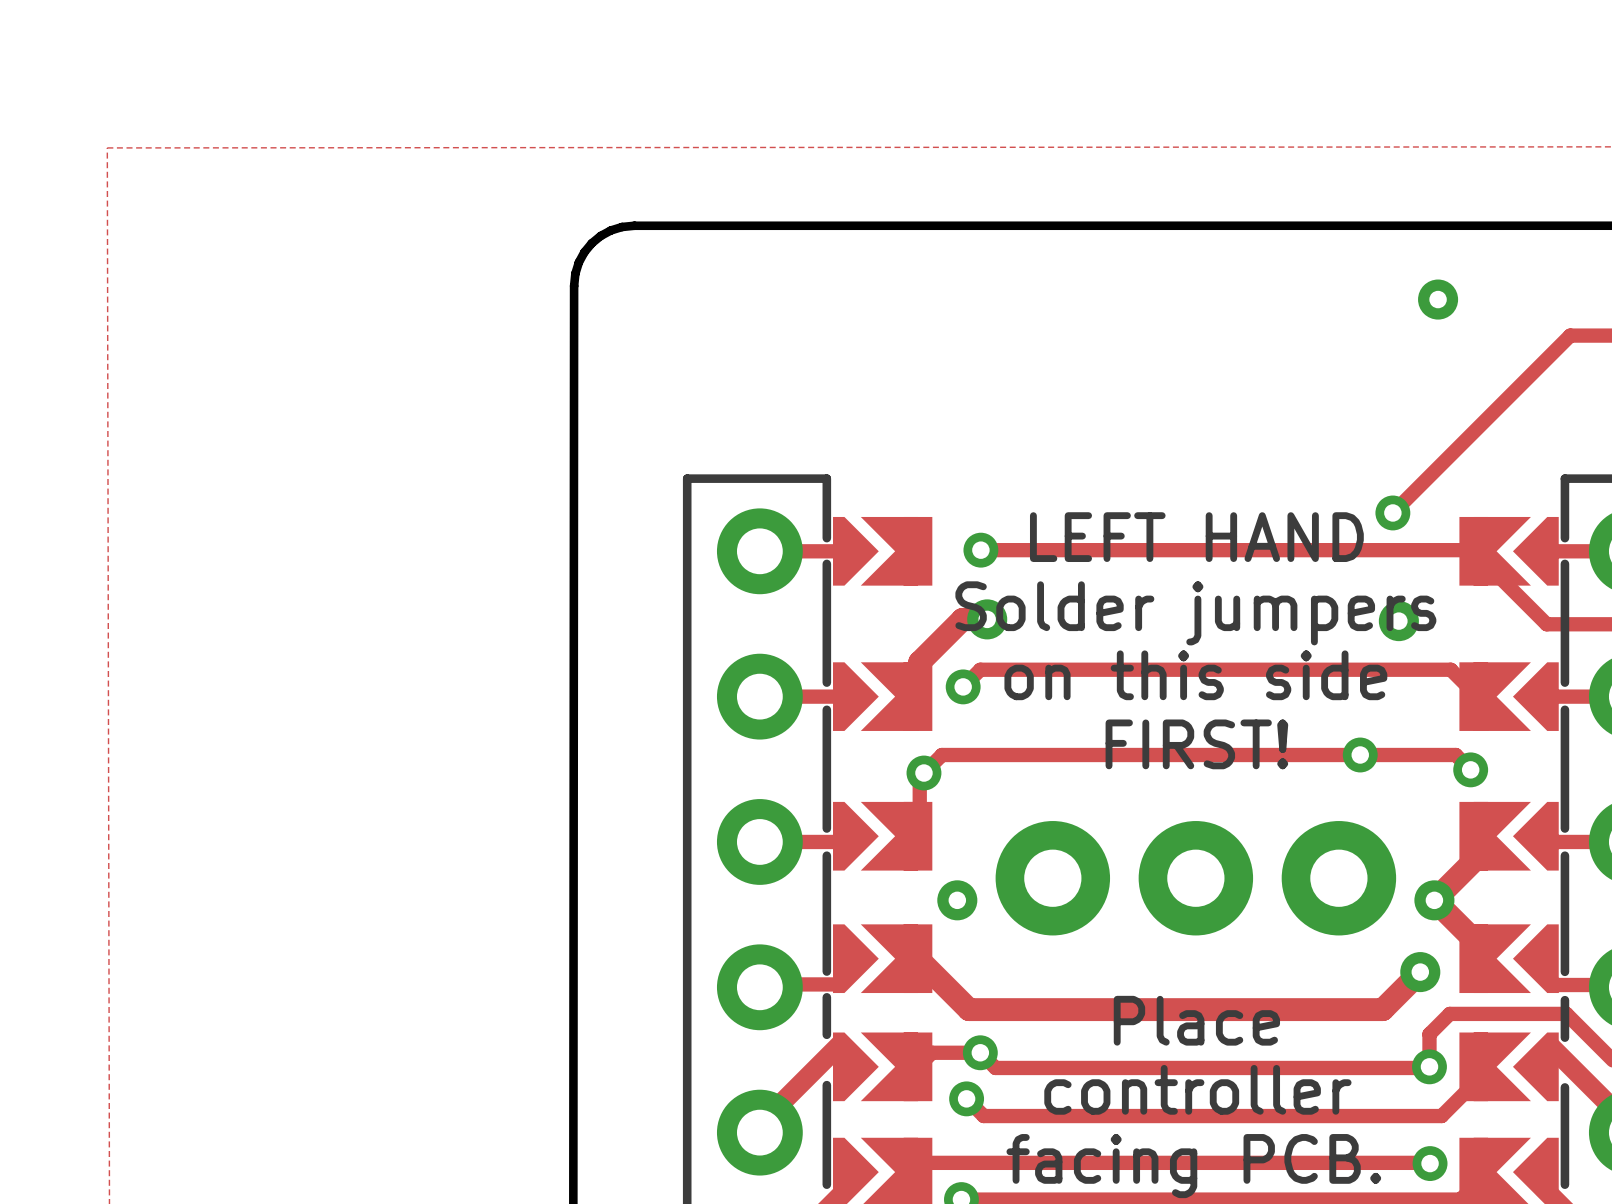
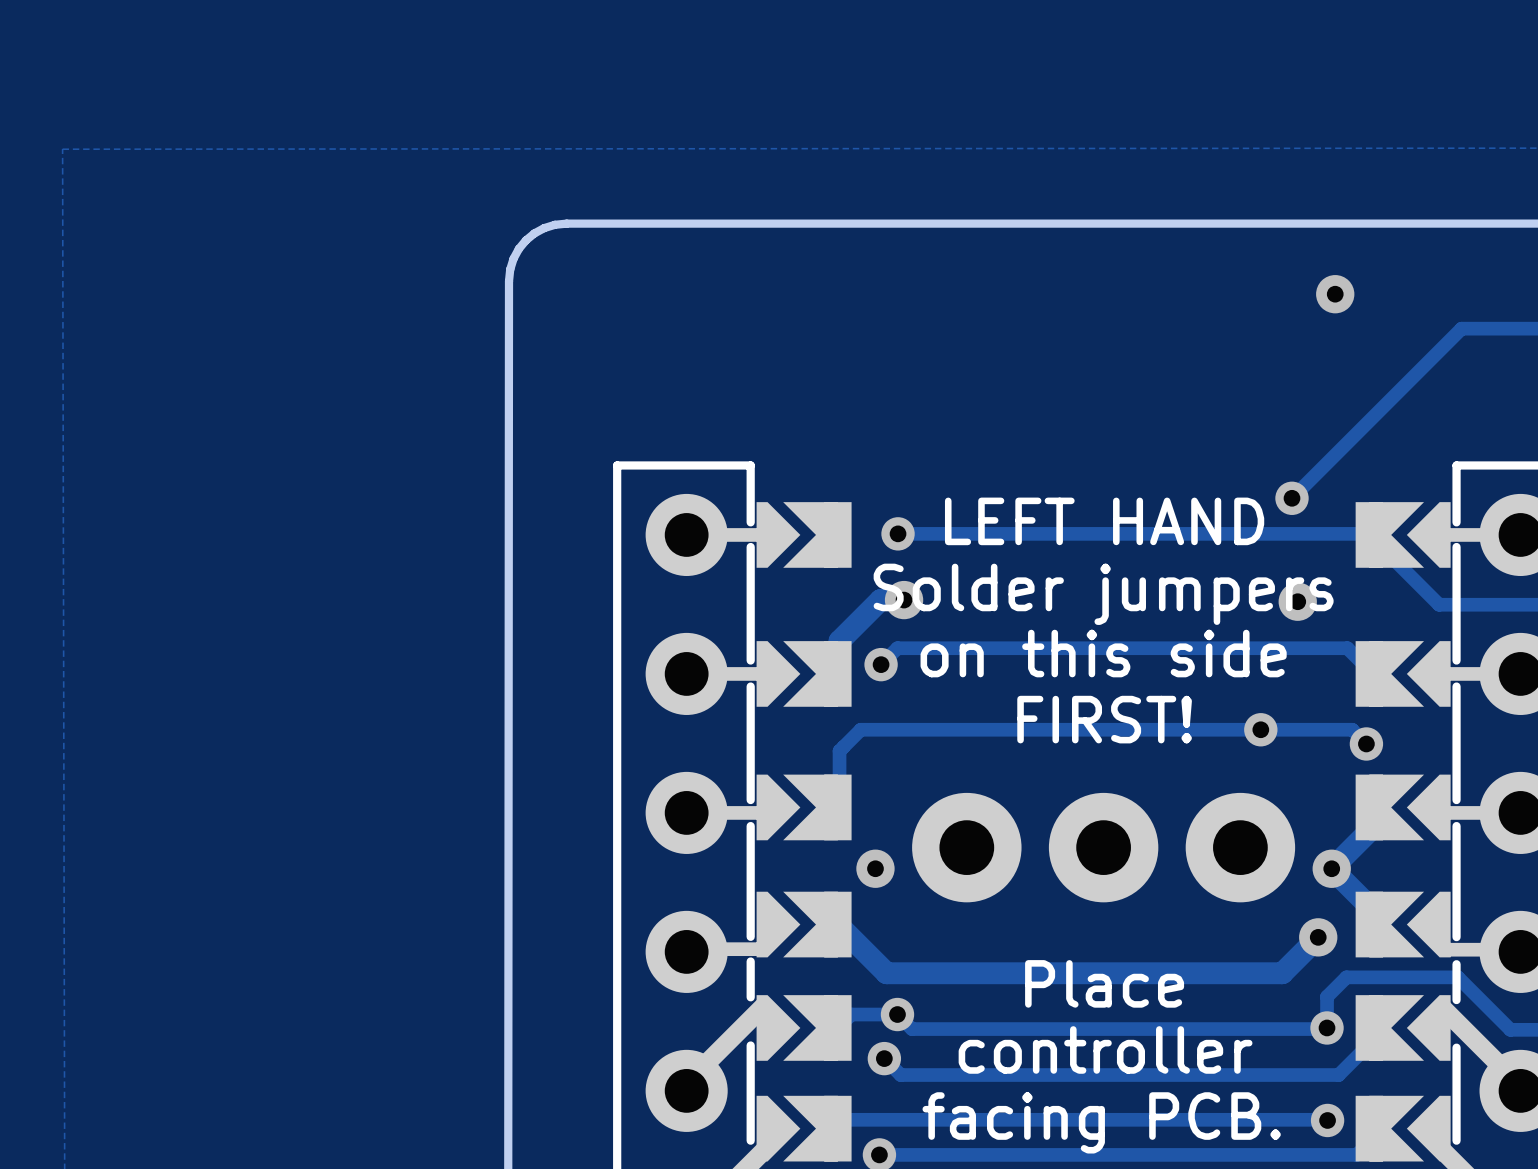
via: (923, 773) -> none

